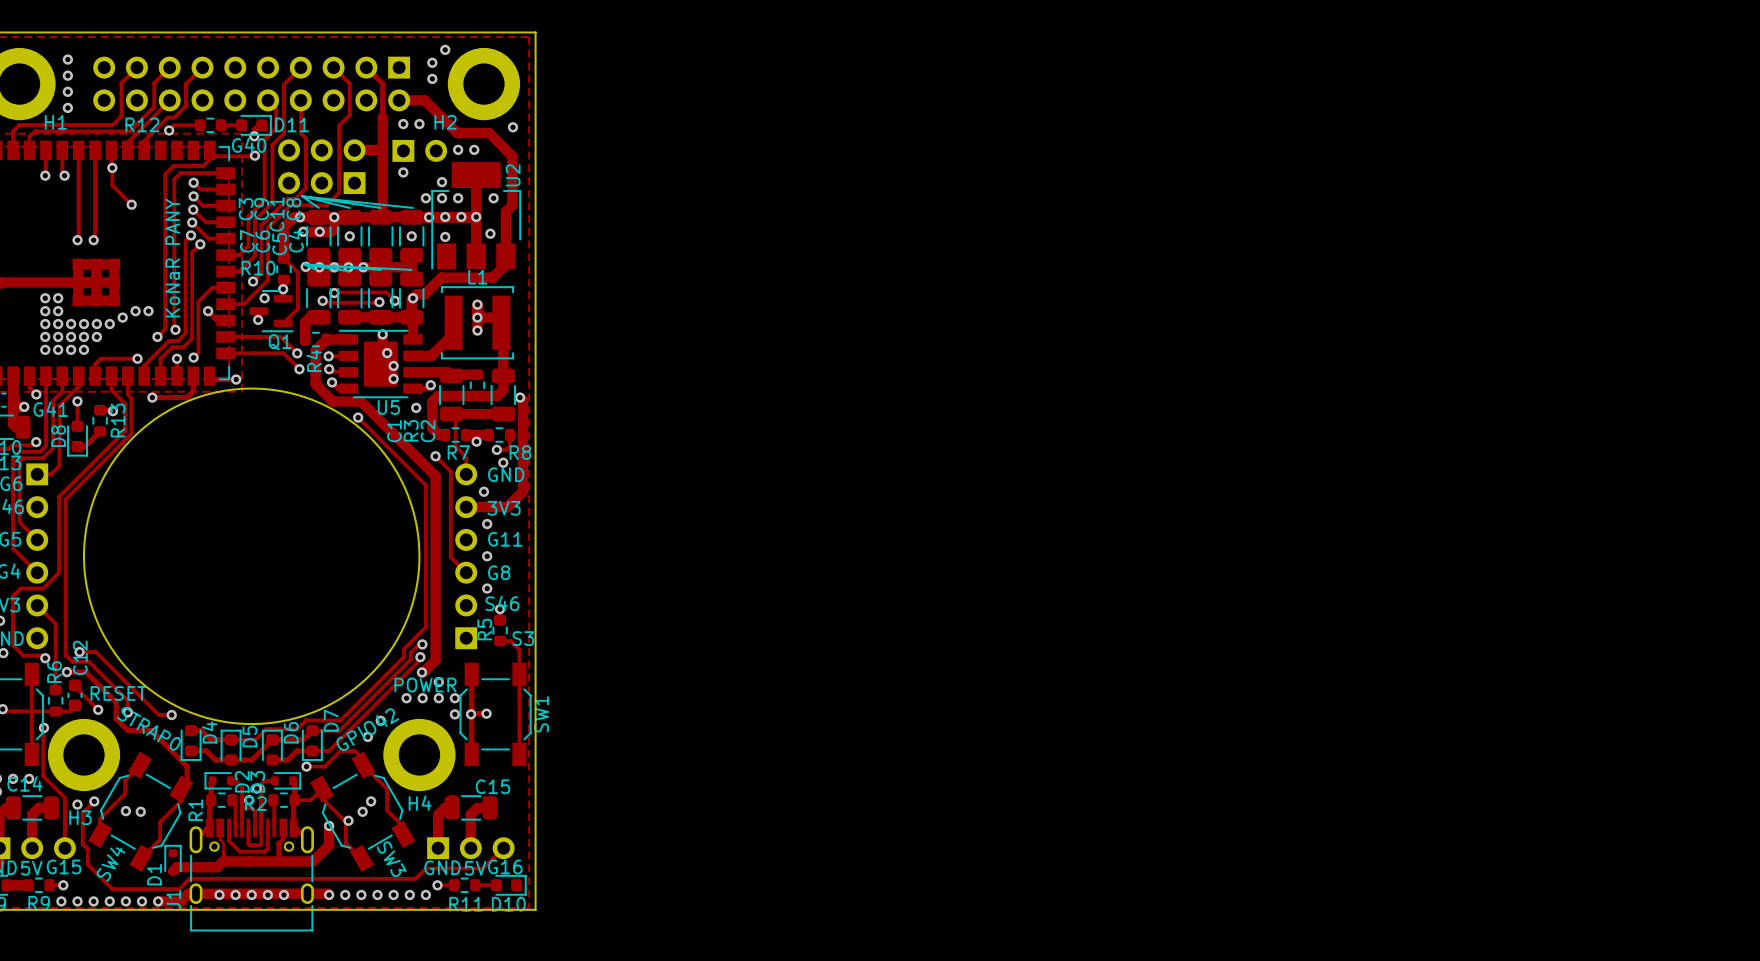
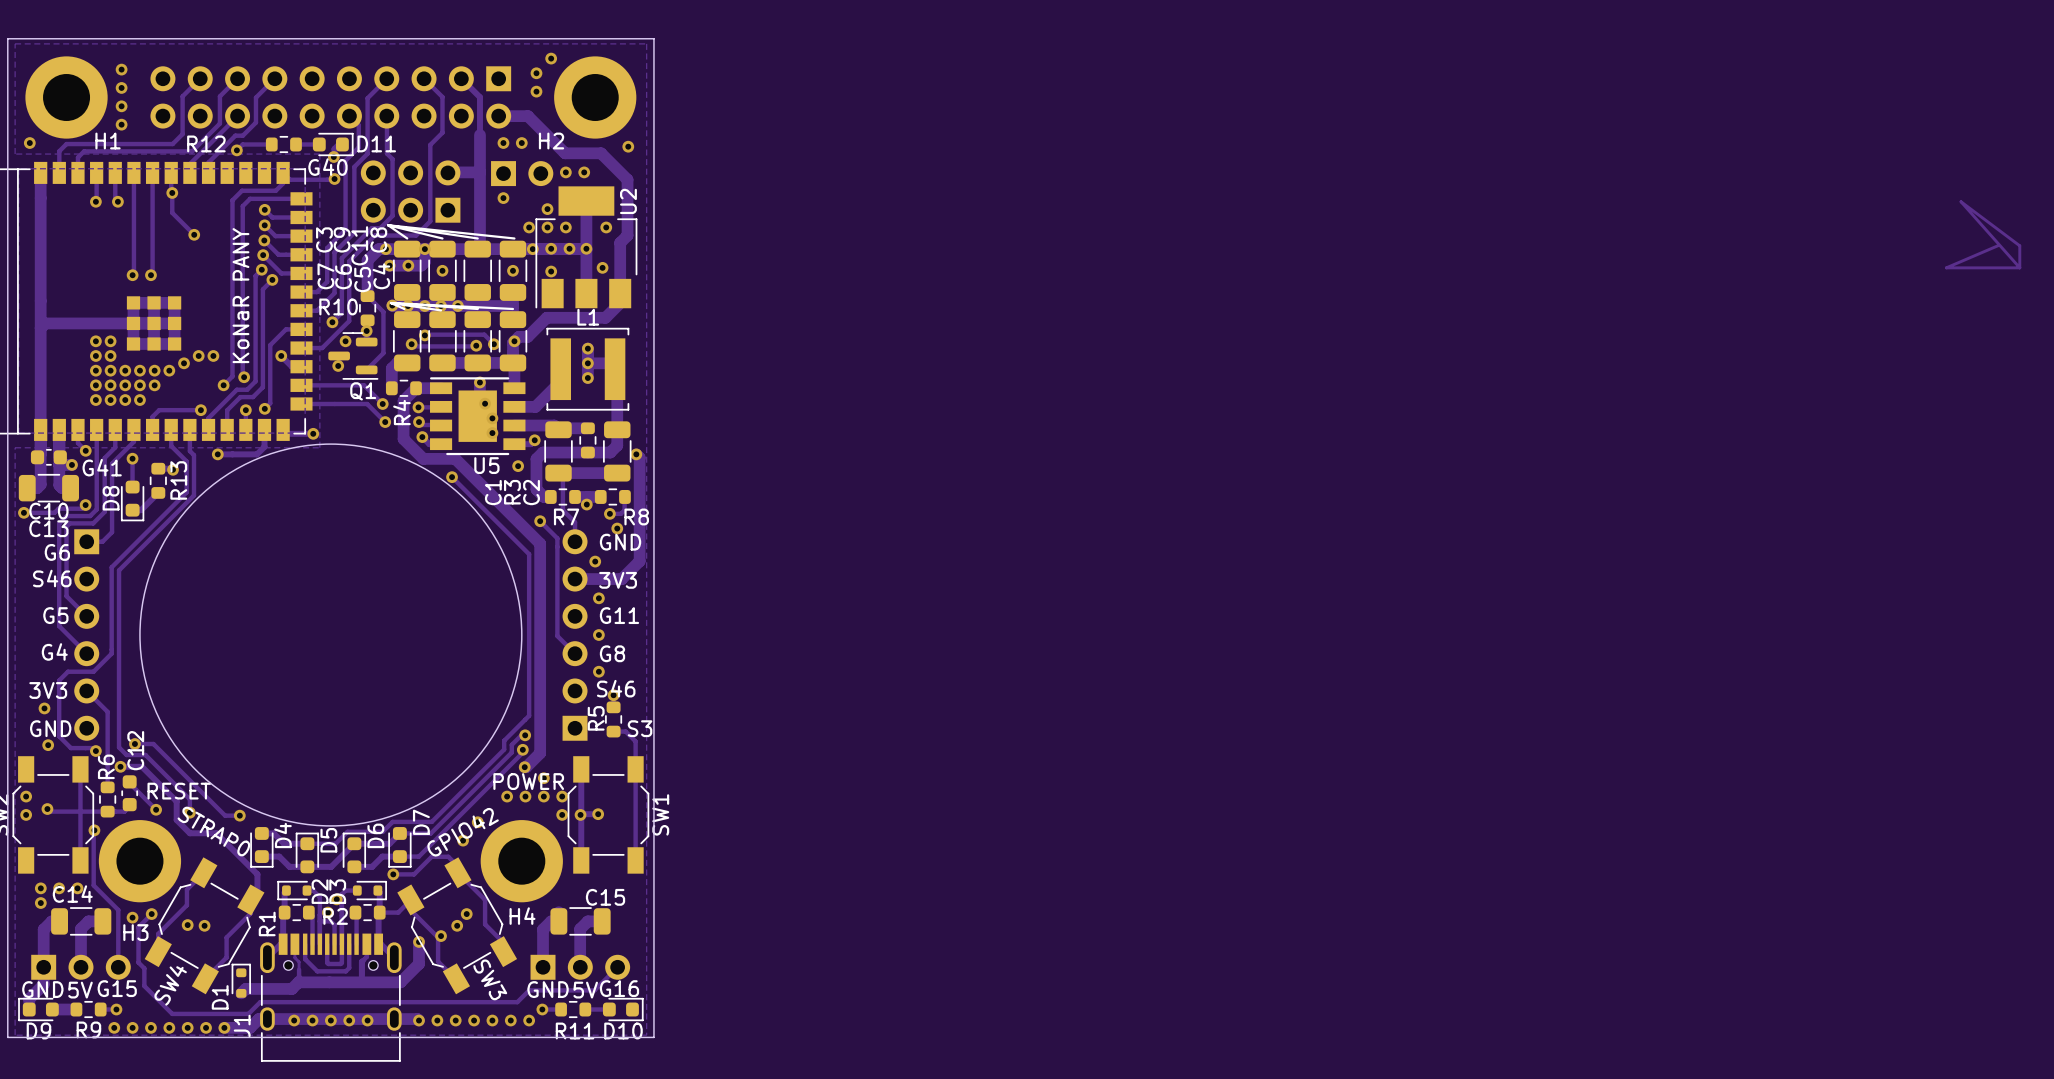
track: none -> (1997, 245) (1946, 267) (2019, 267)
track: none -> (2019, 267) (2019, 245) (1961, 201) (2019, 267)

